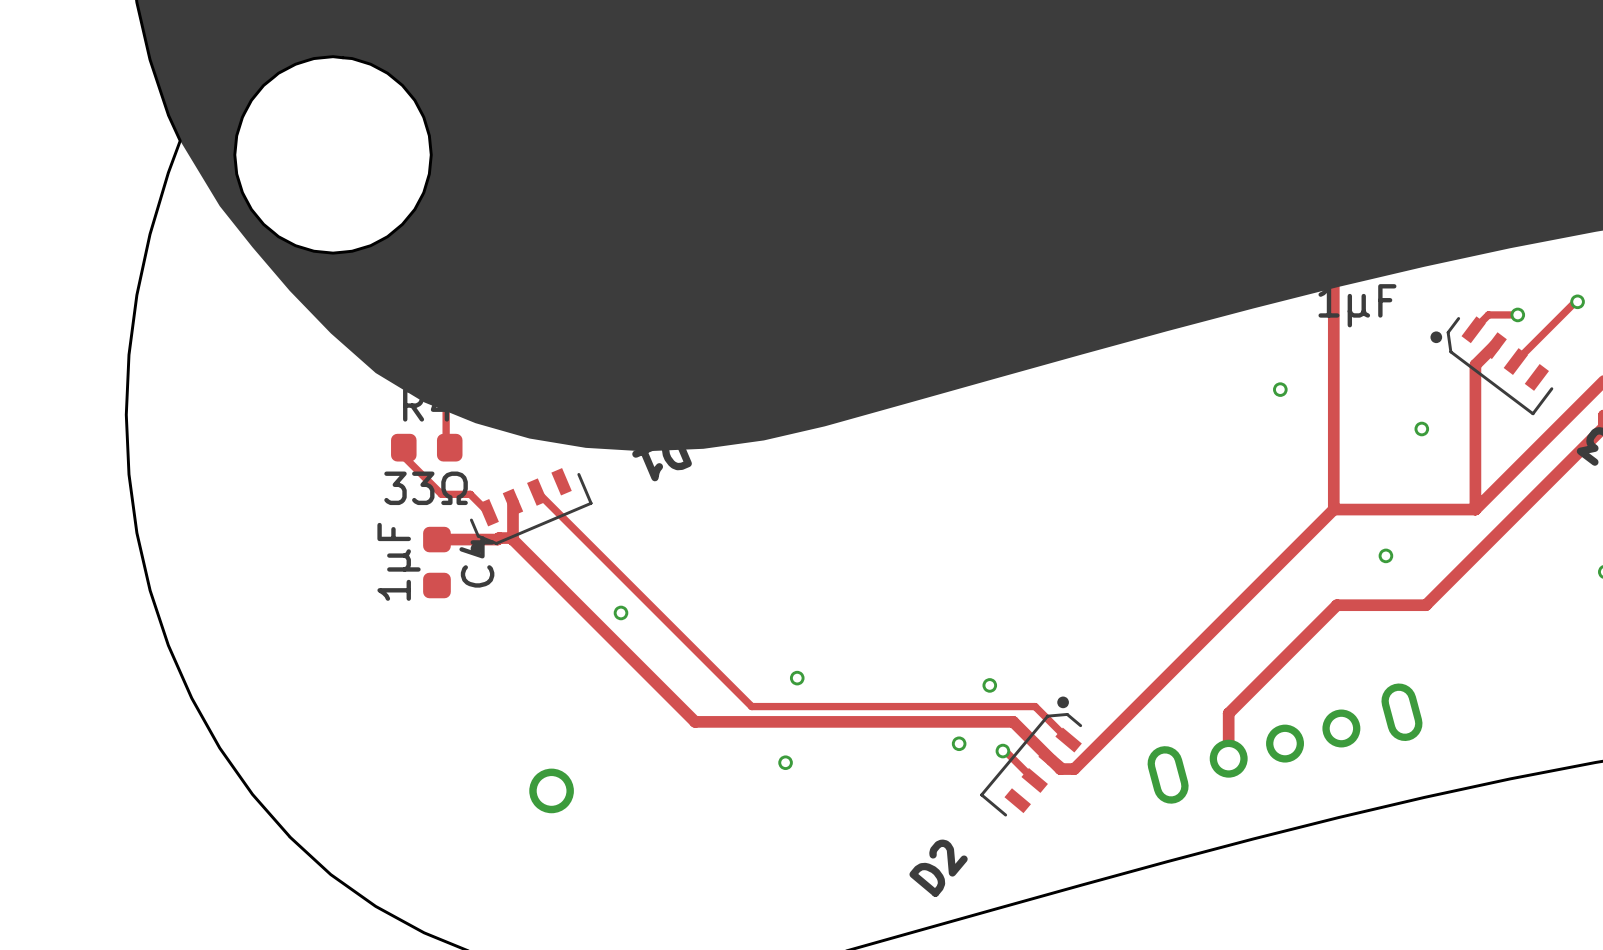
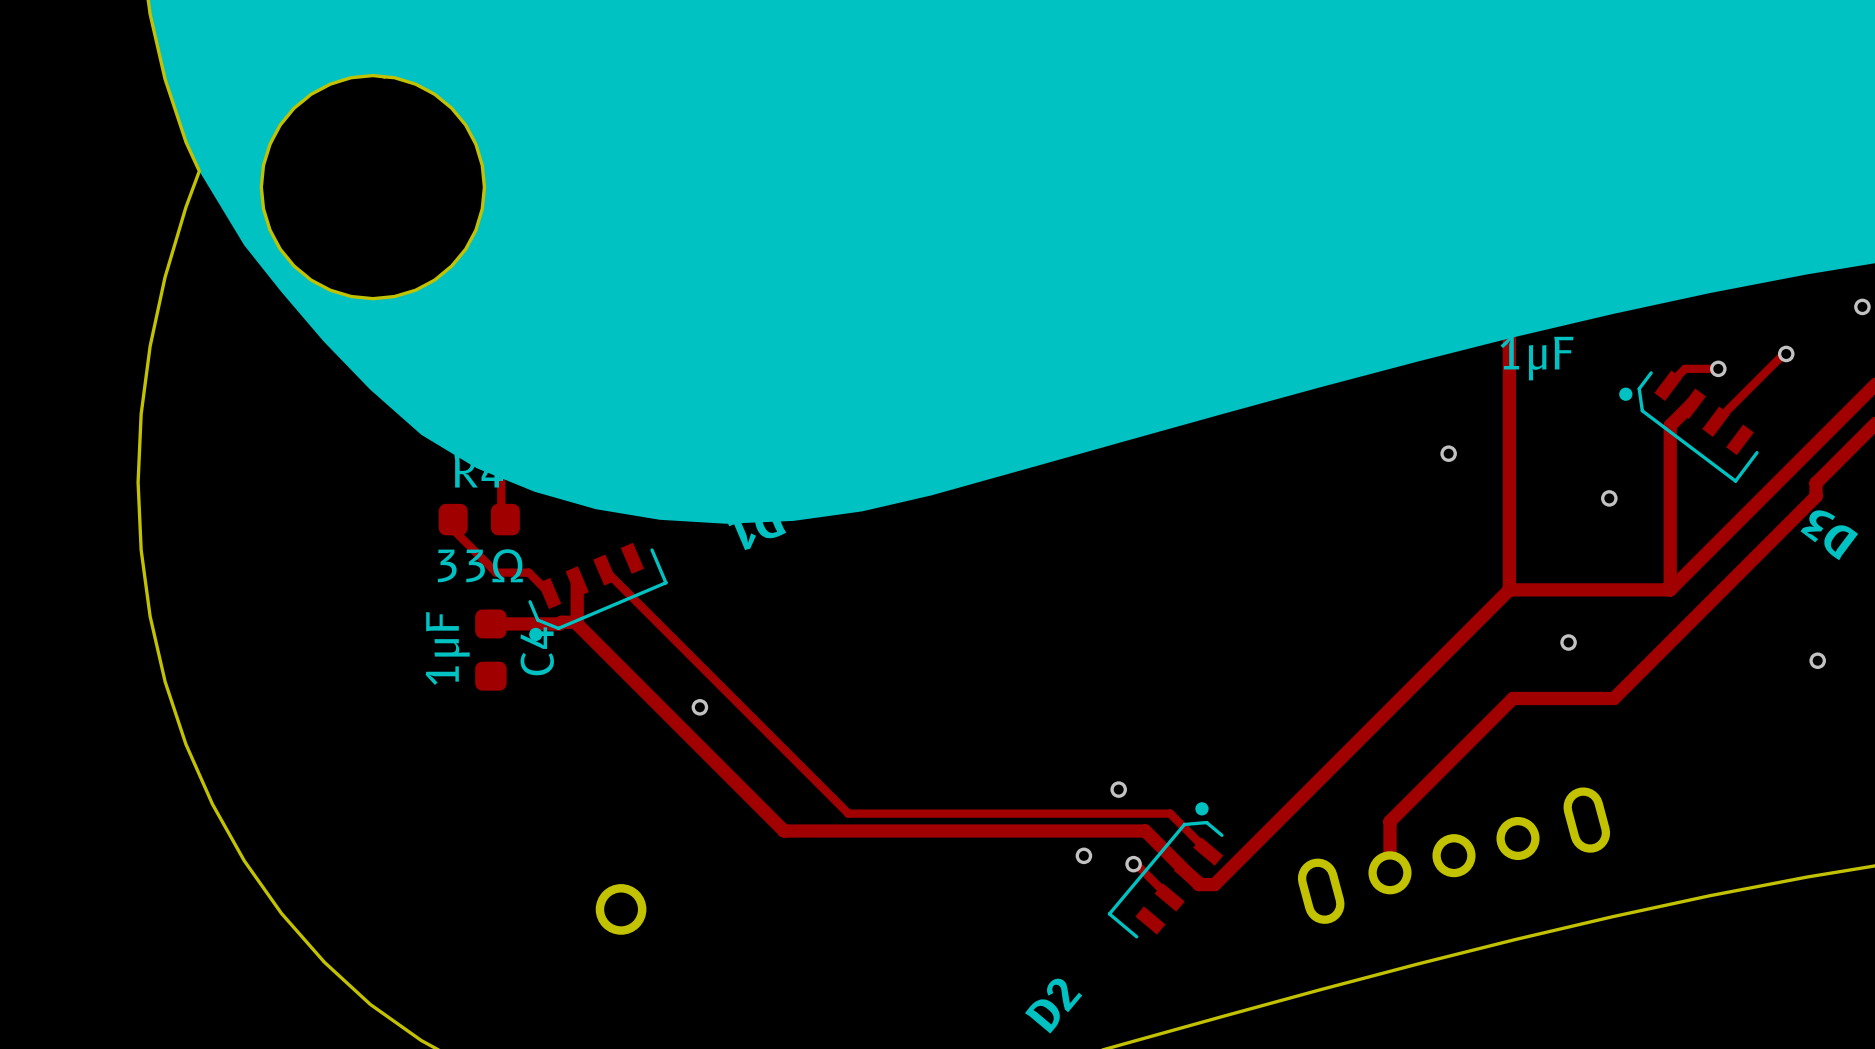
via: (797, 678) -> none
via: (785, 762) -> none

